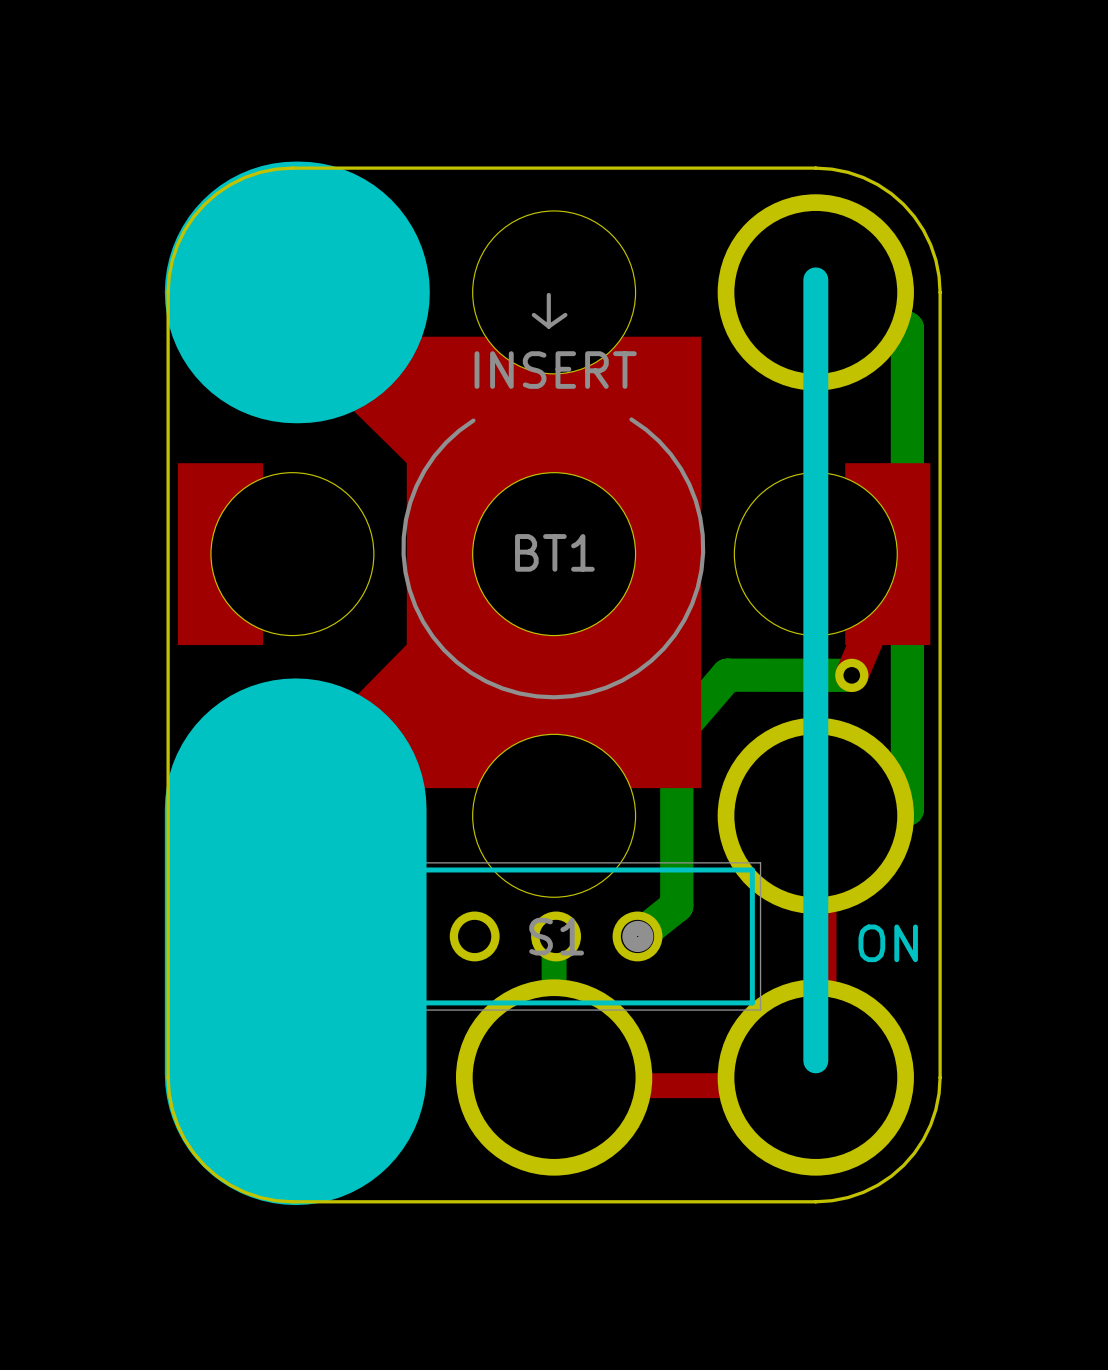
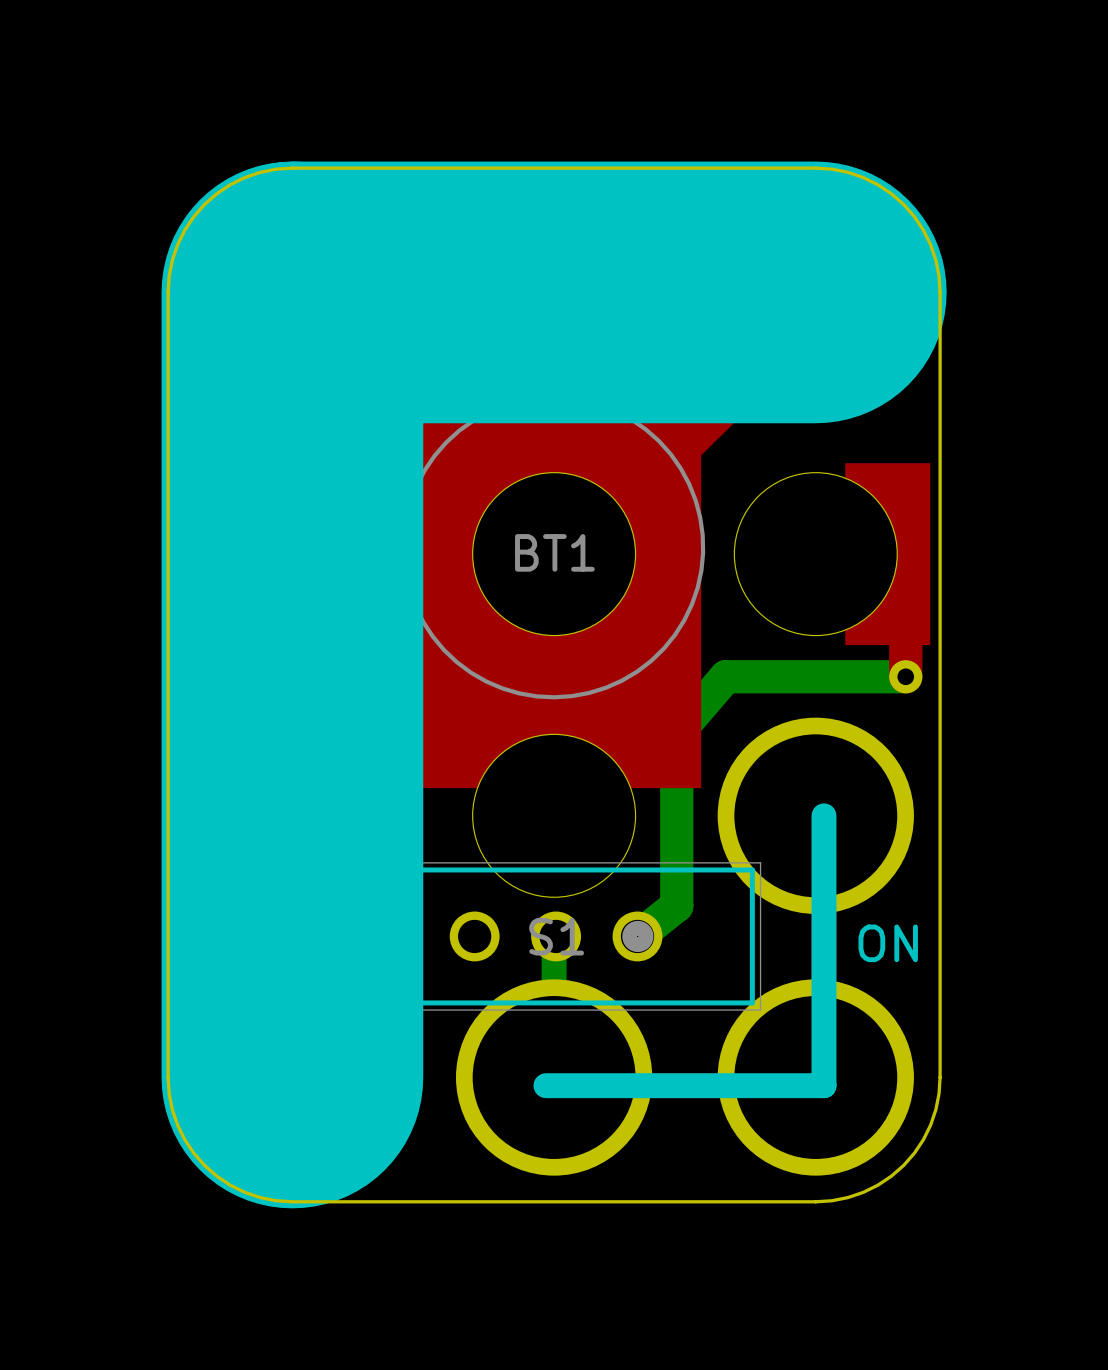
BT1 footprint: [164, 161, 942, 1206] -> [161, 161, 947, 1209]

